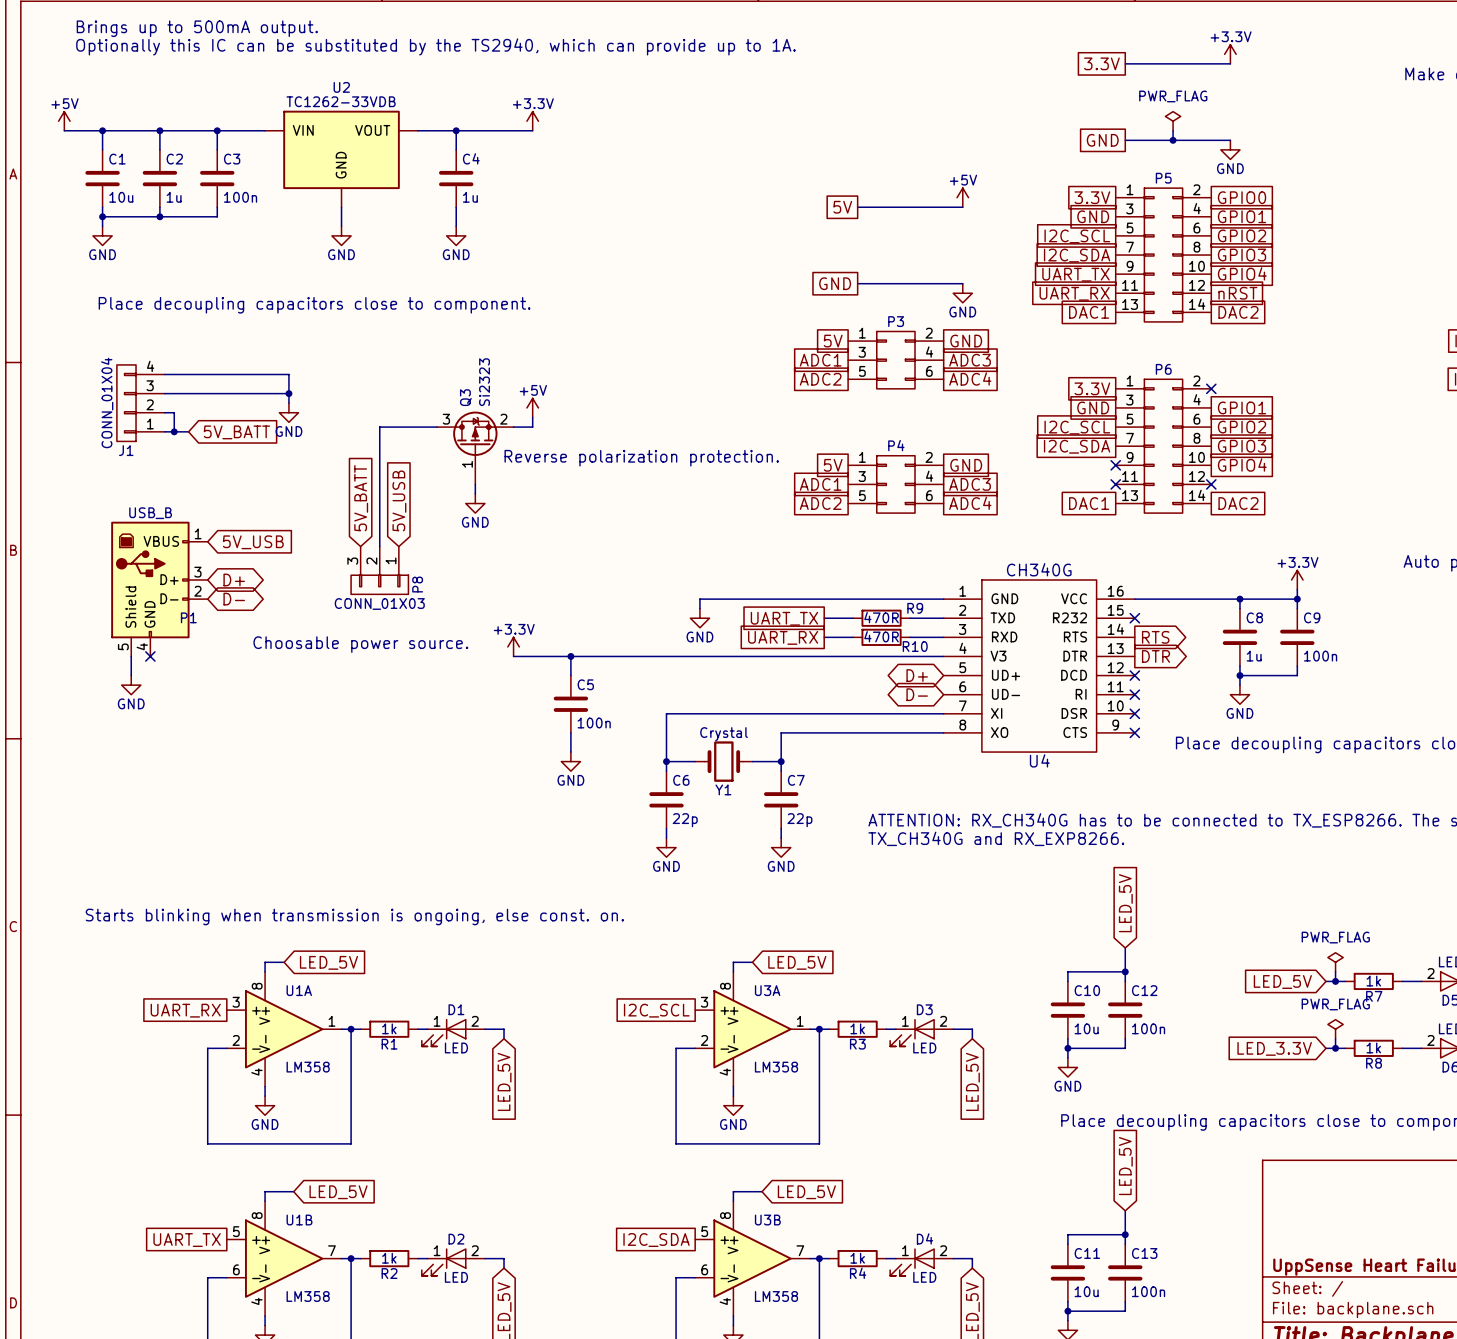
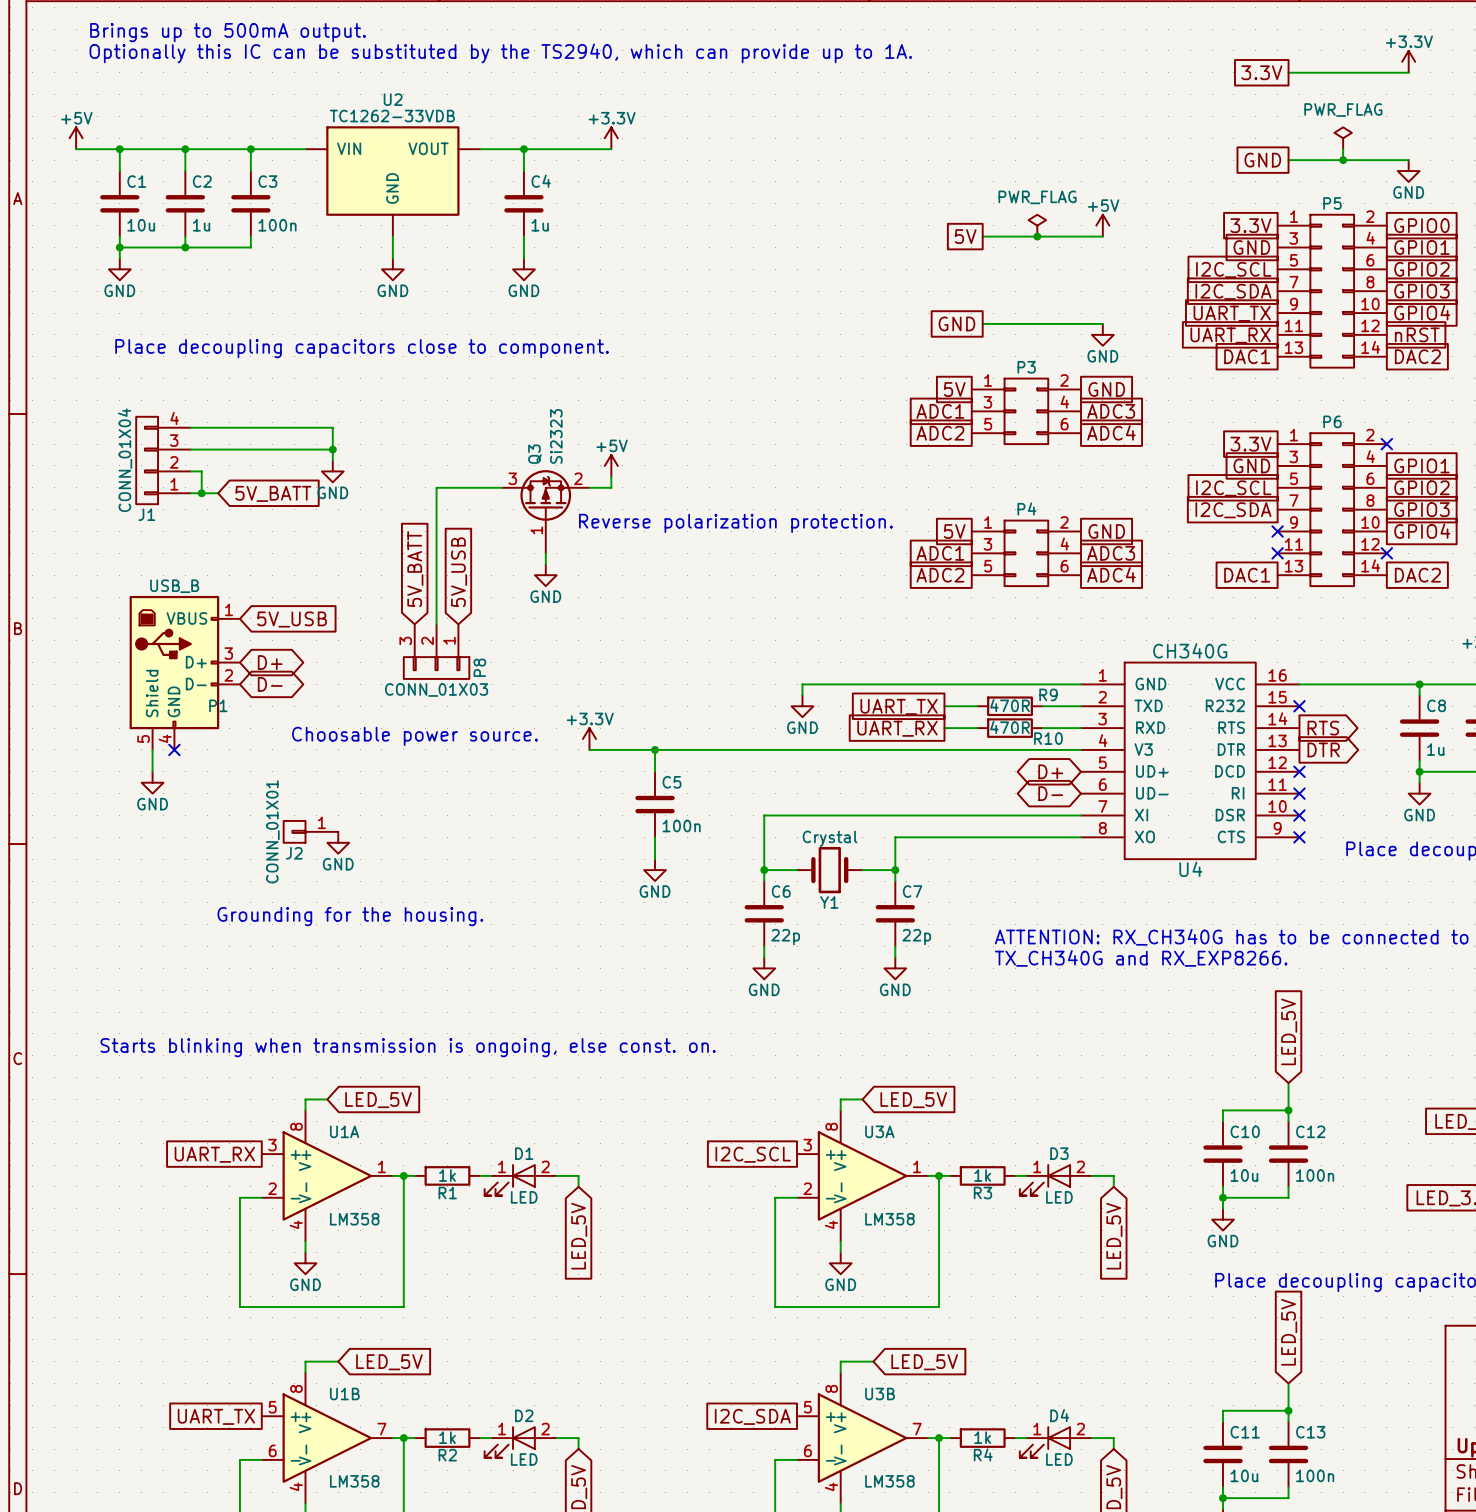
power symbol: none -> PWR_FLAG (1037, 225)
junction: none -> (1037, 236)
J2: none -> CONN_01X01 (310, 831)
power symbol: none -> GND (338, 842)
text: none -> Grounding for the housing. (350, 916)

